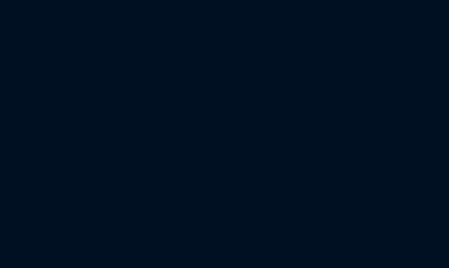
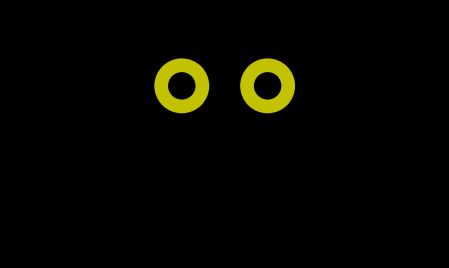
part: none -> (224, 85)

